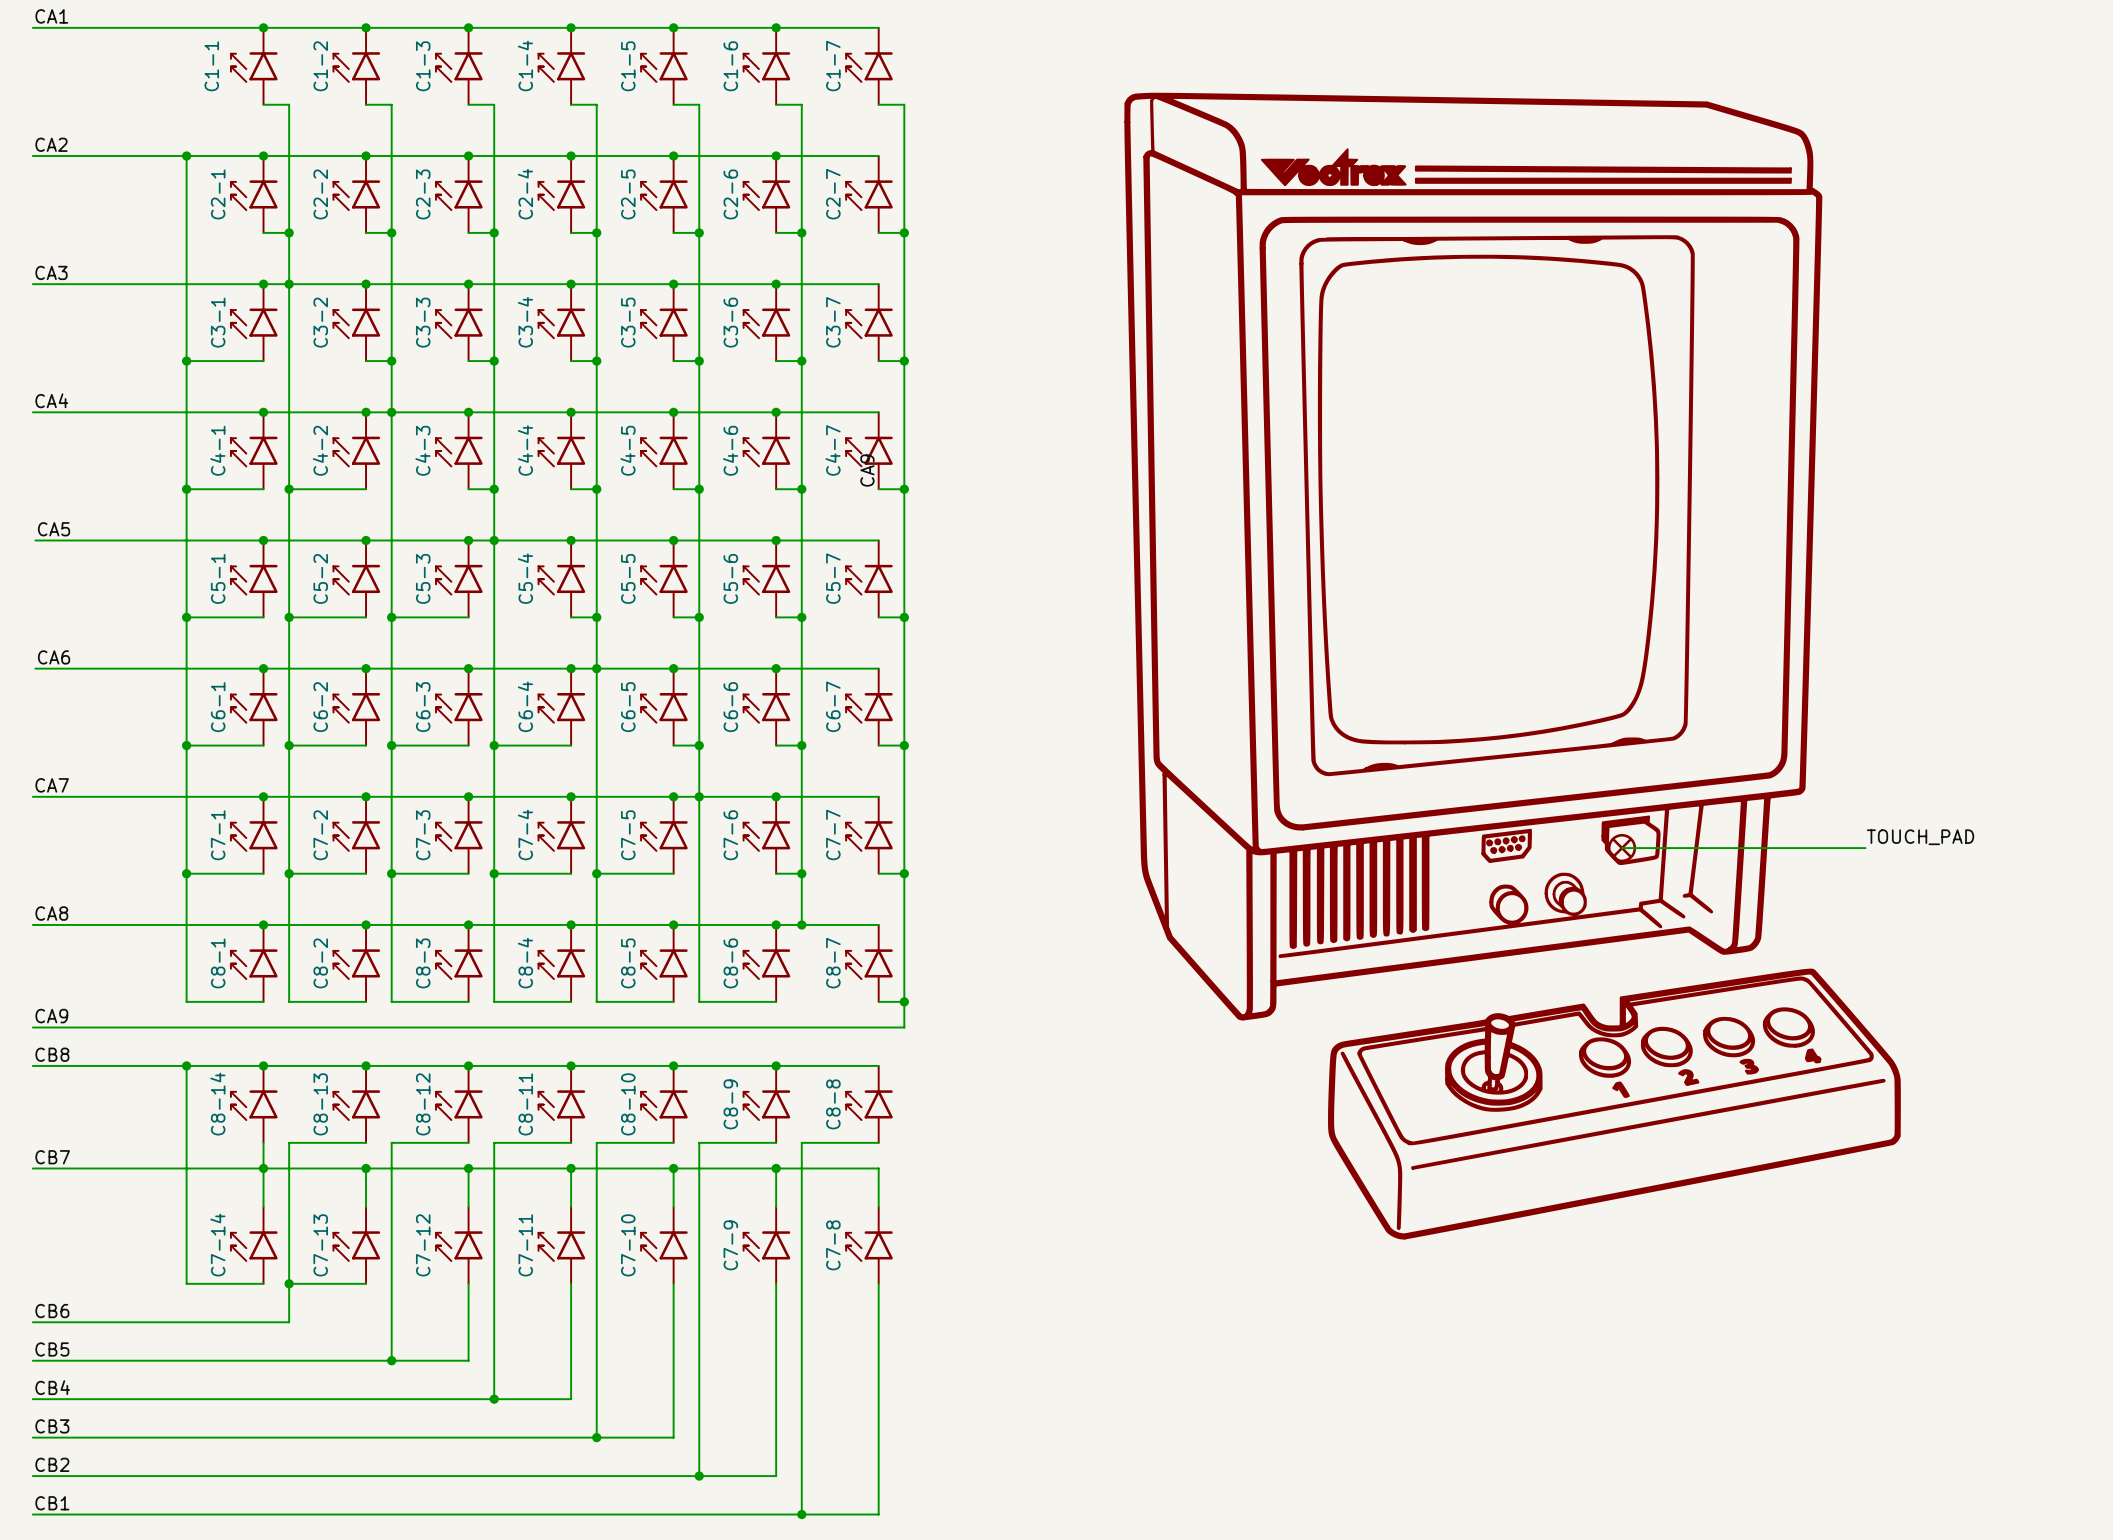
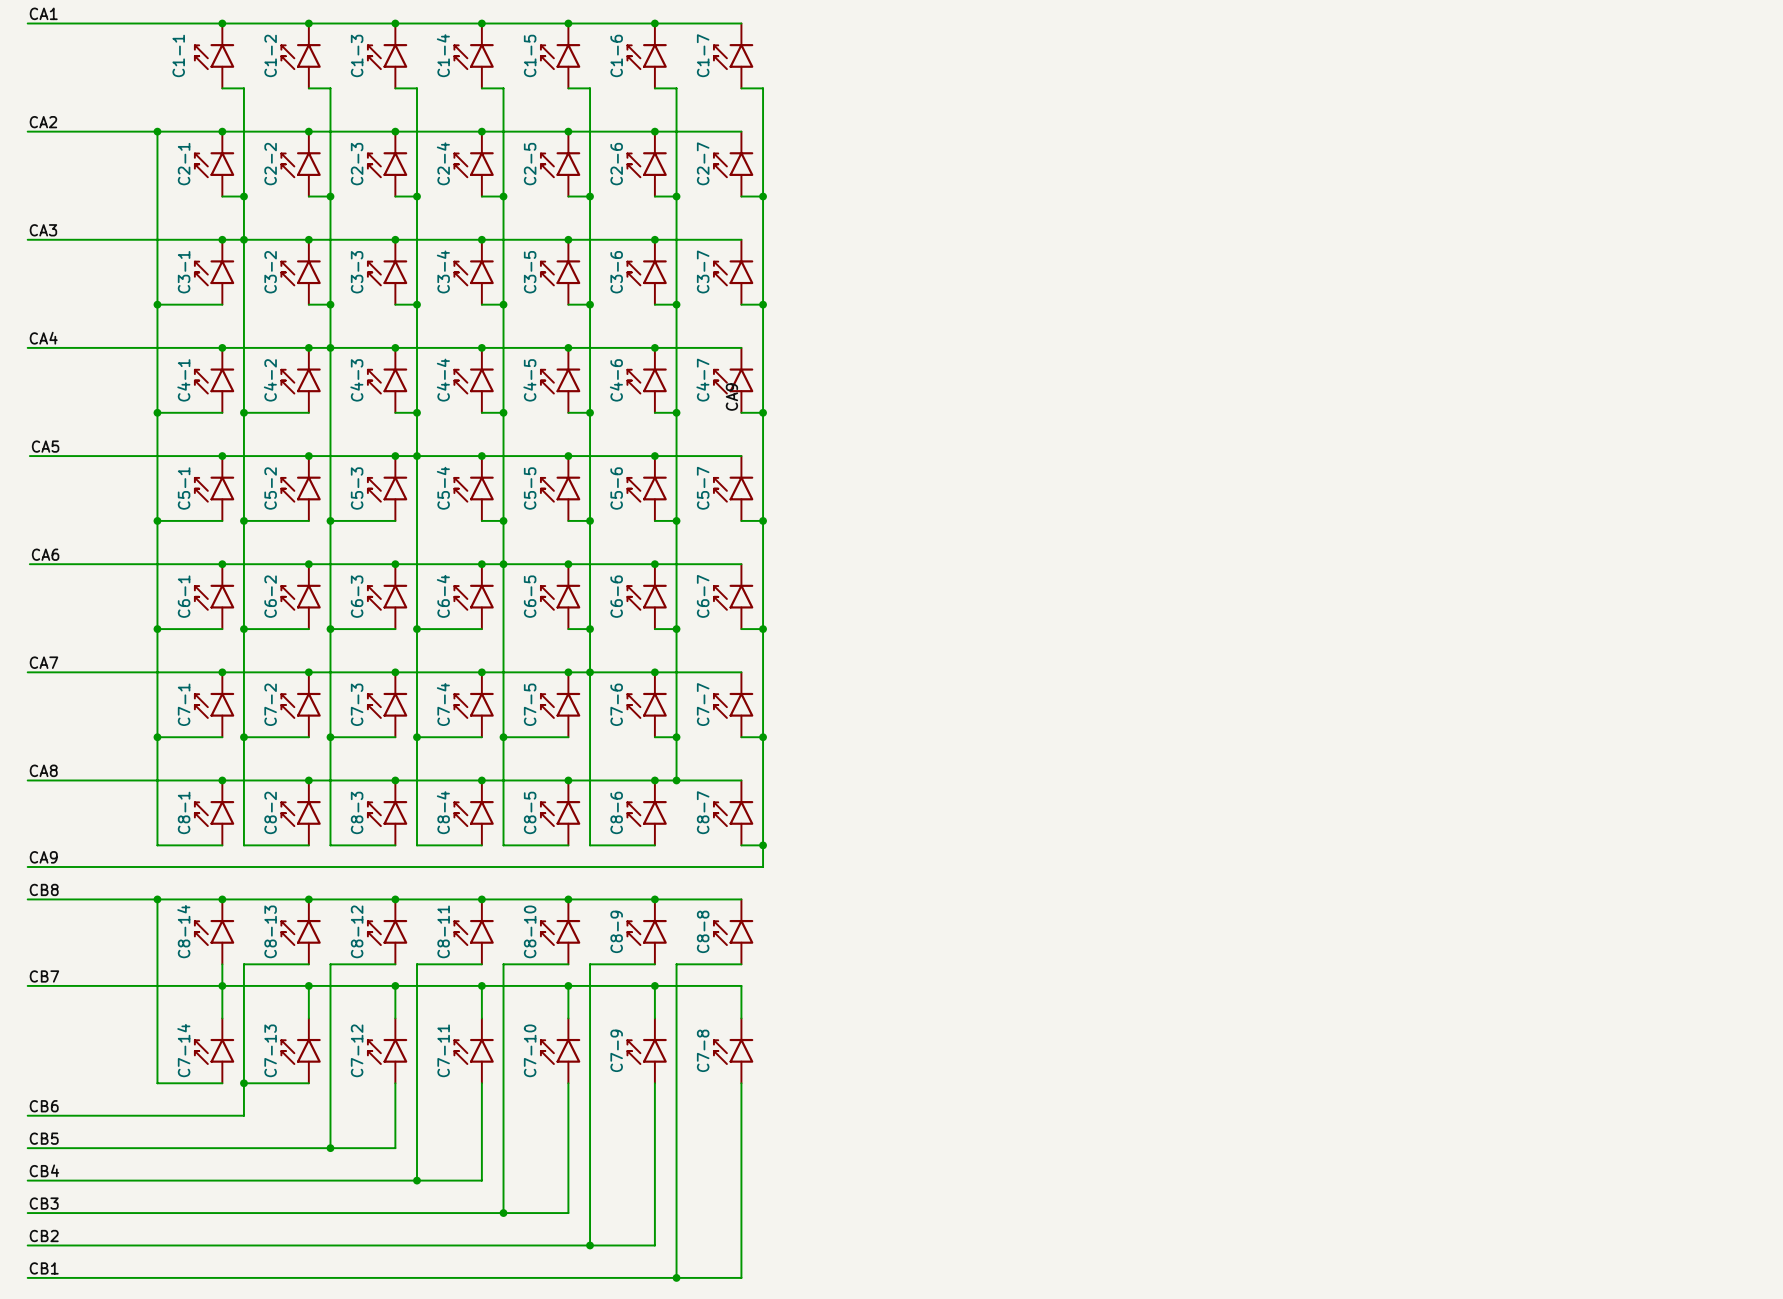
power symbol: (1512, 666) -> none
label: TOUCH_PAD (1920, 837) -> none
wire: (1622, 848) (1865, 848) -> none
part: (1622, 848) -> none

